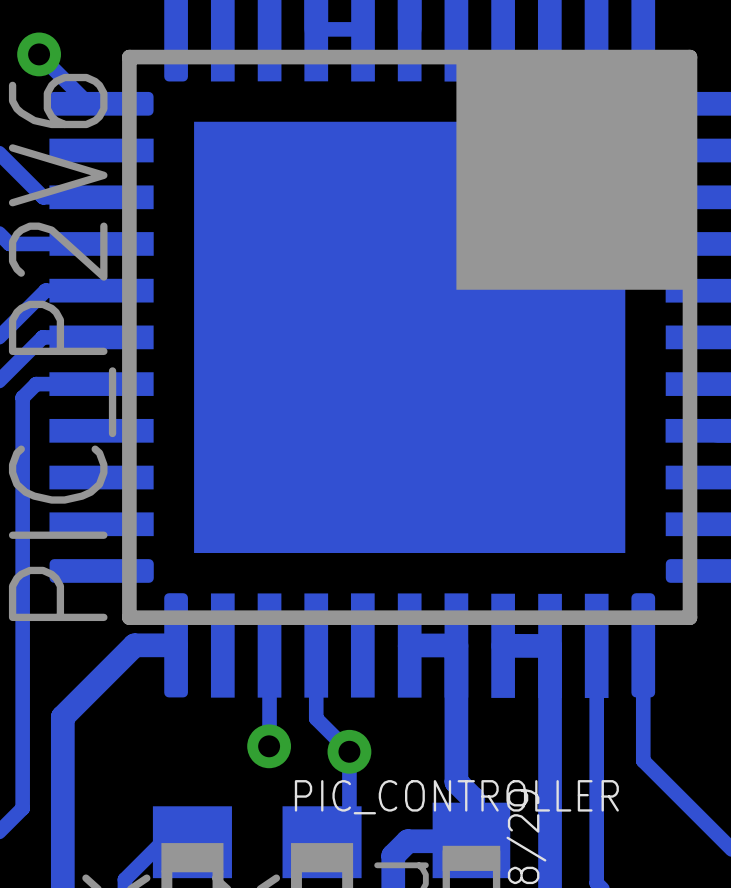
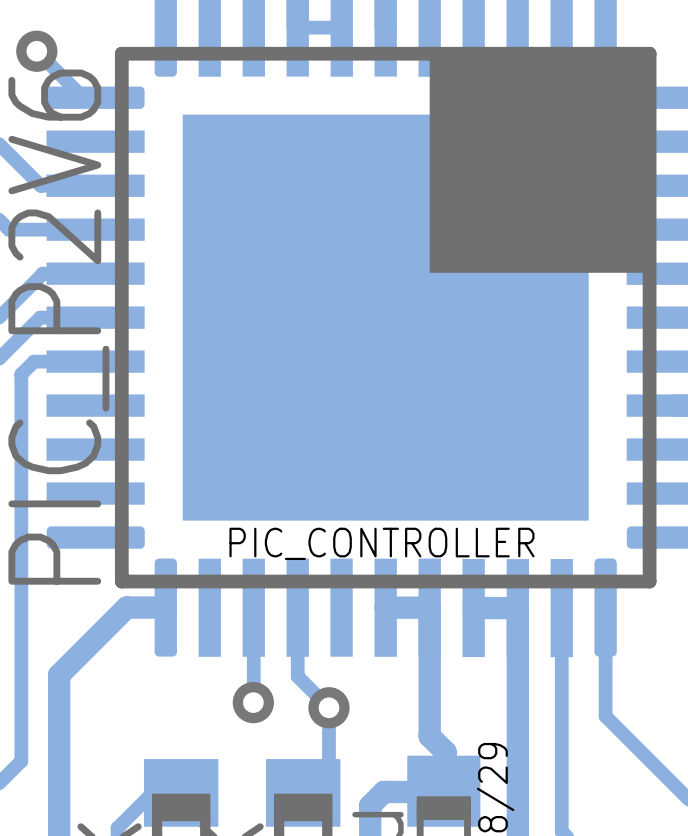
PIC_CONTROLLER name position: PIC_CONTROLLER (456, 797) -> PIC_CONTROLLER (381, 543)

